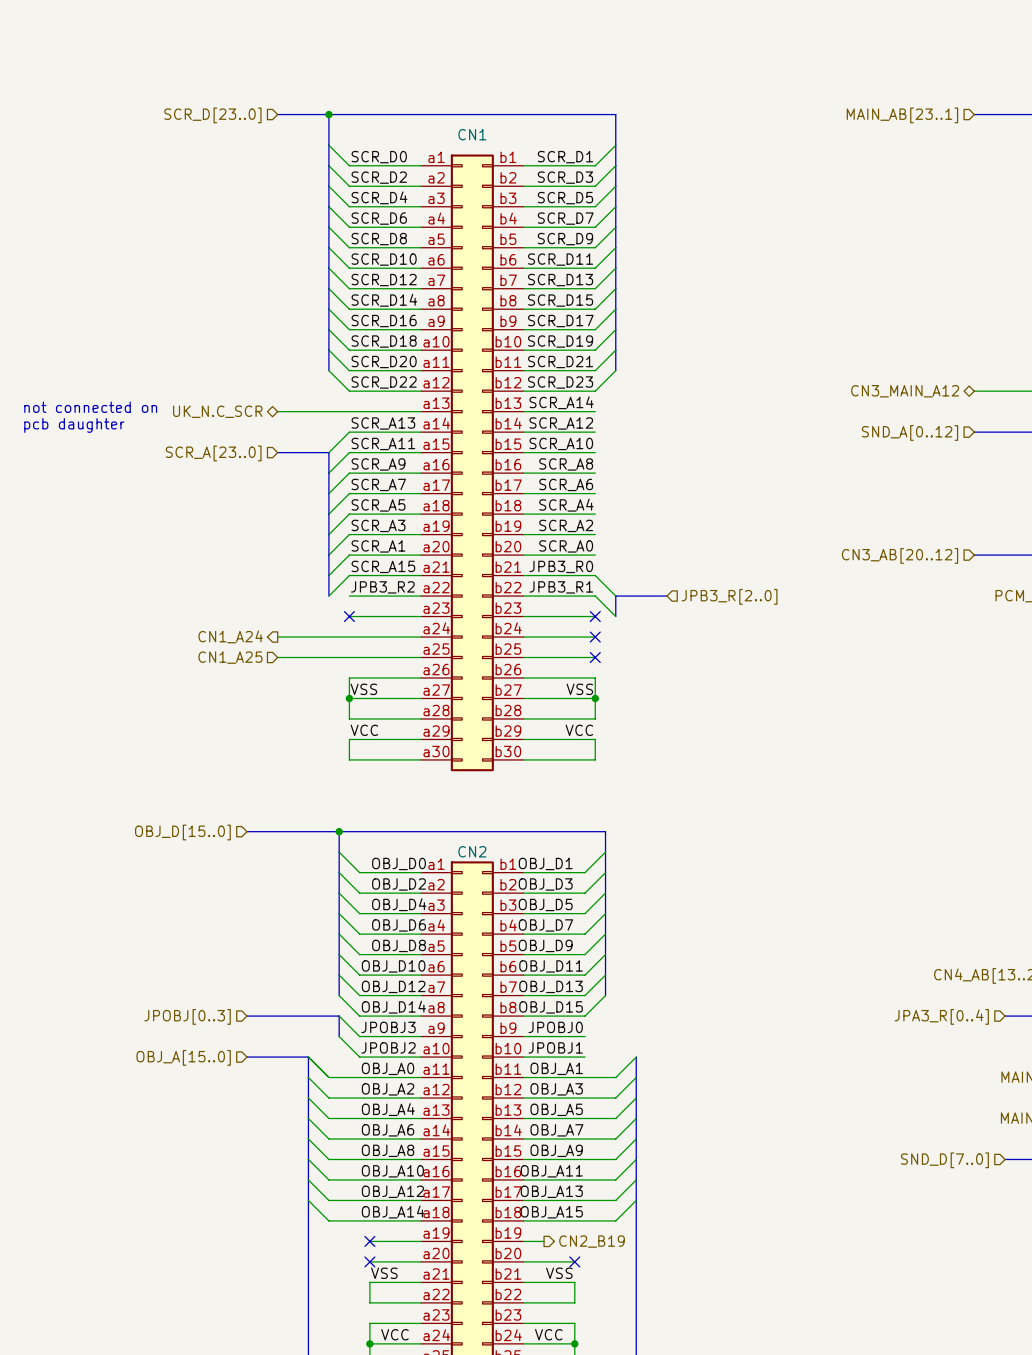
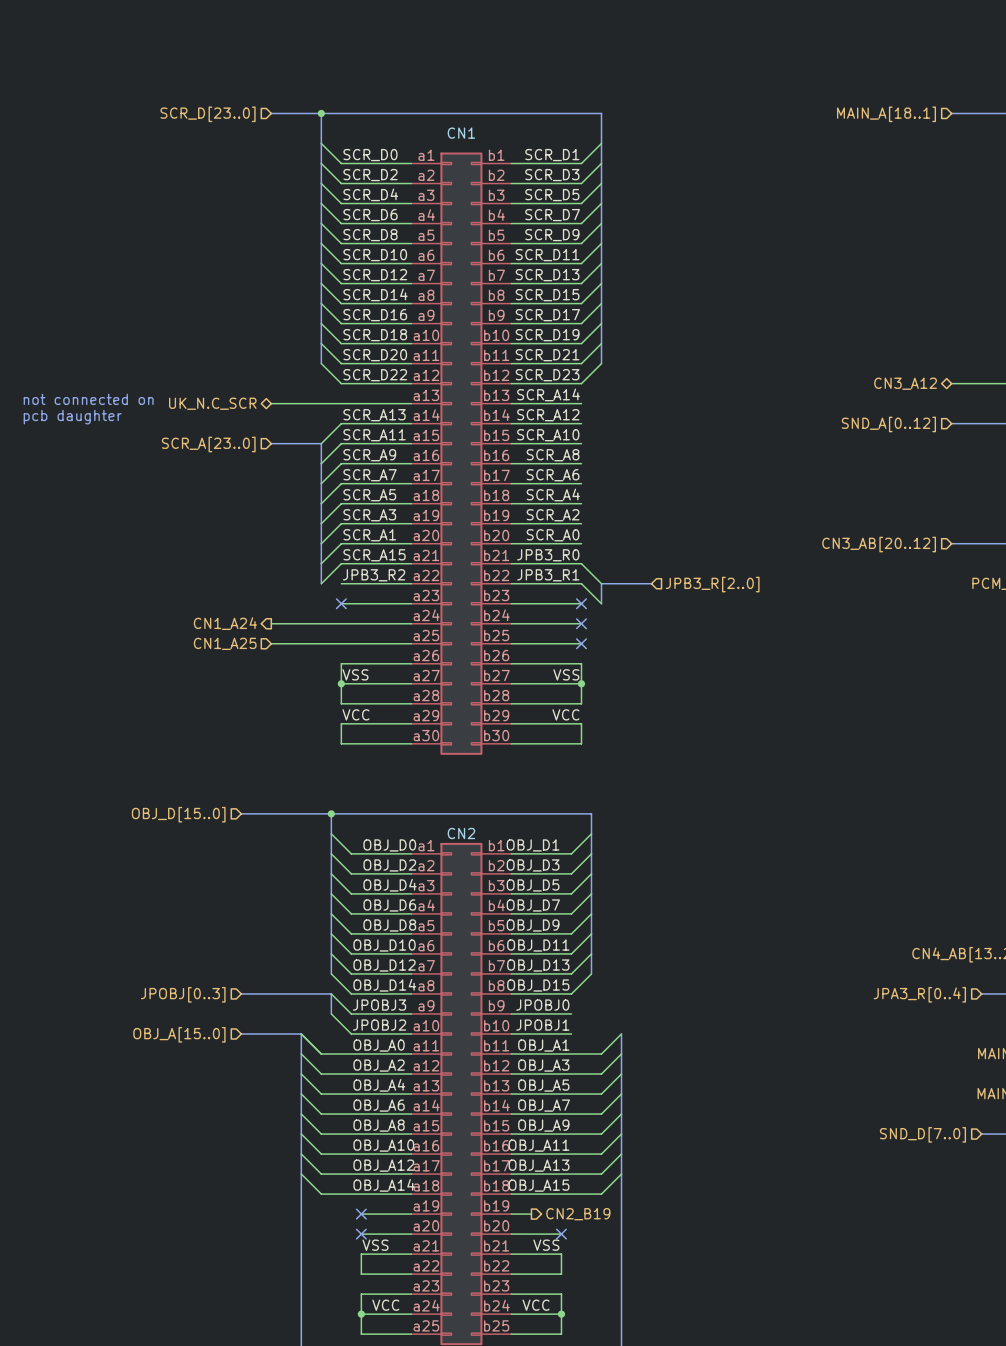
hierarchical label: MAIN_AB[23..1] (902, 115) -> MAIN_A[18..1] (886, 114)
hierarchical label: CN3_MAIN_A12 (905, 391) -> CN3_A12 (905, 383)

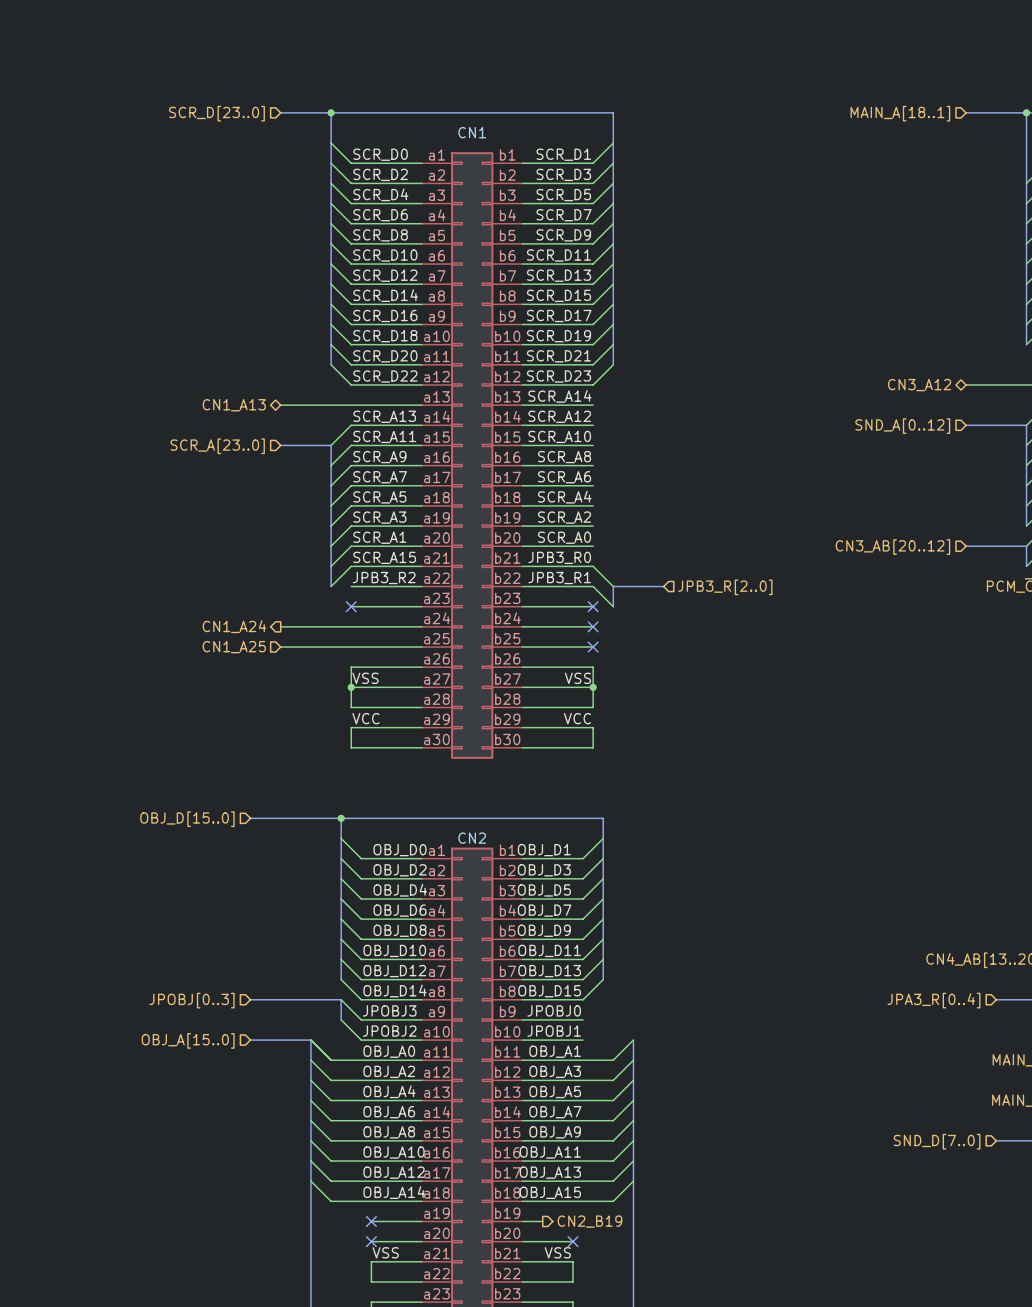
text: not connected on (88, 399) -> none
hierarchical label: UK_N.C_SCR (212, 403) -> CN1_A13 (234, 405)
text: pcb daughter (72, 417) -> none

